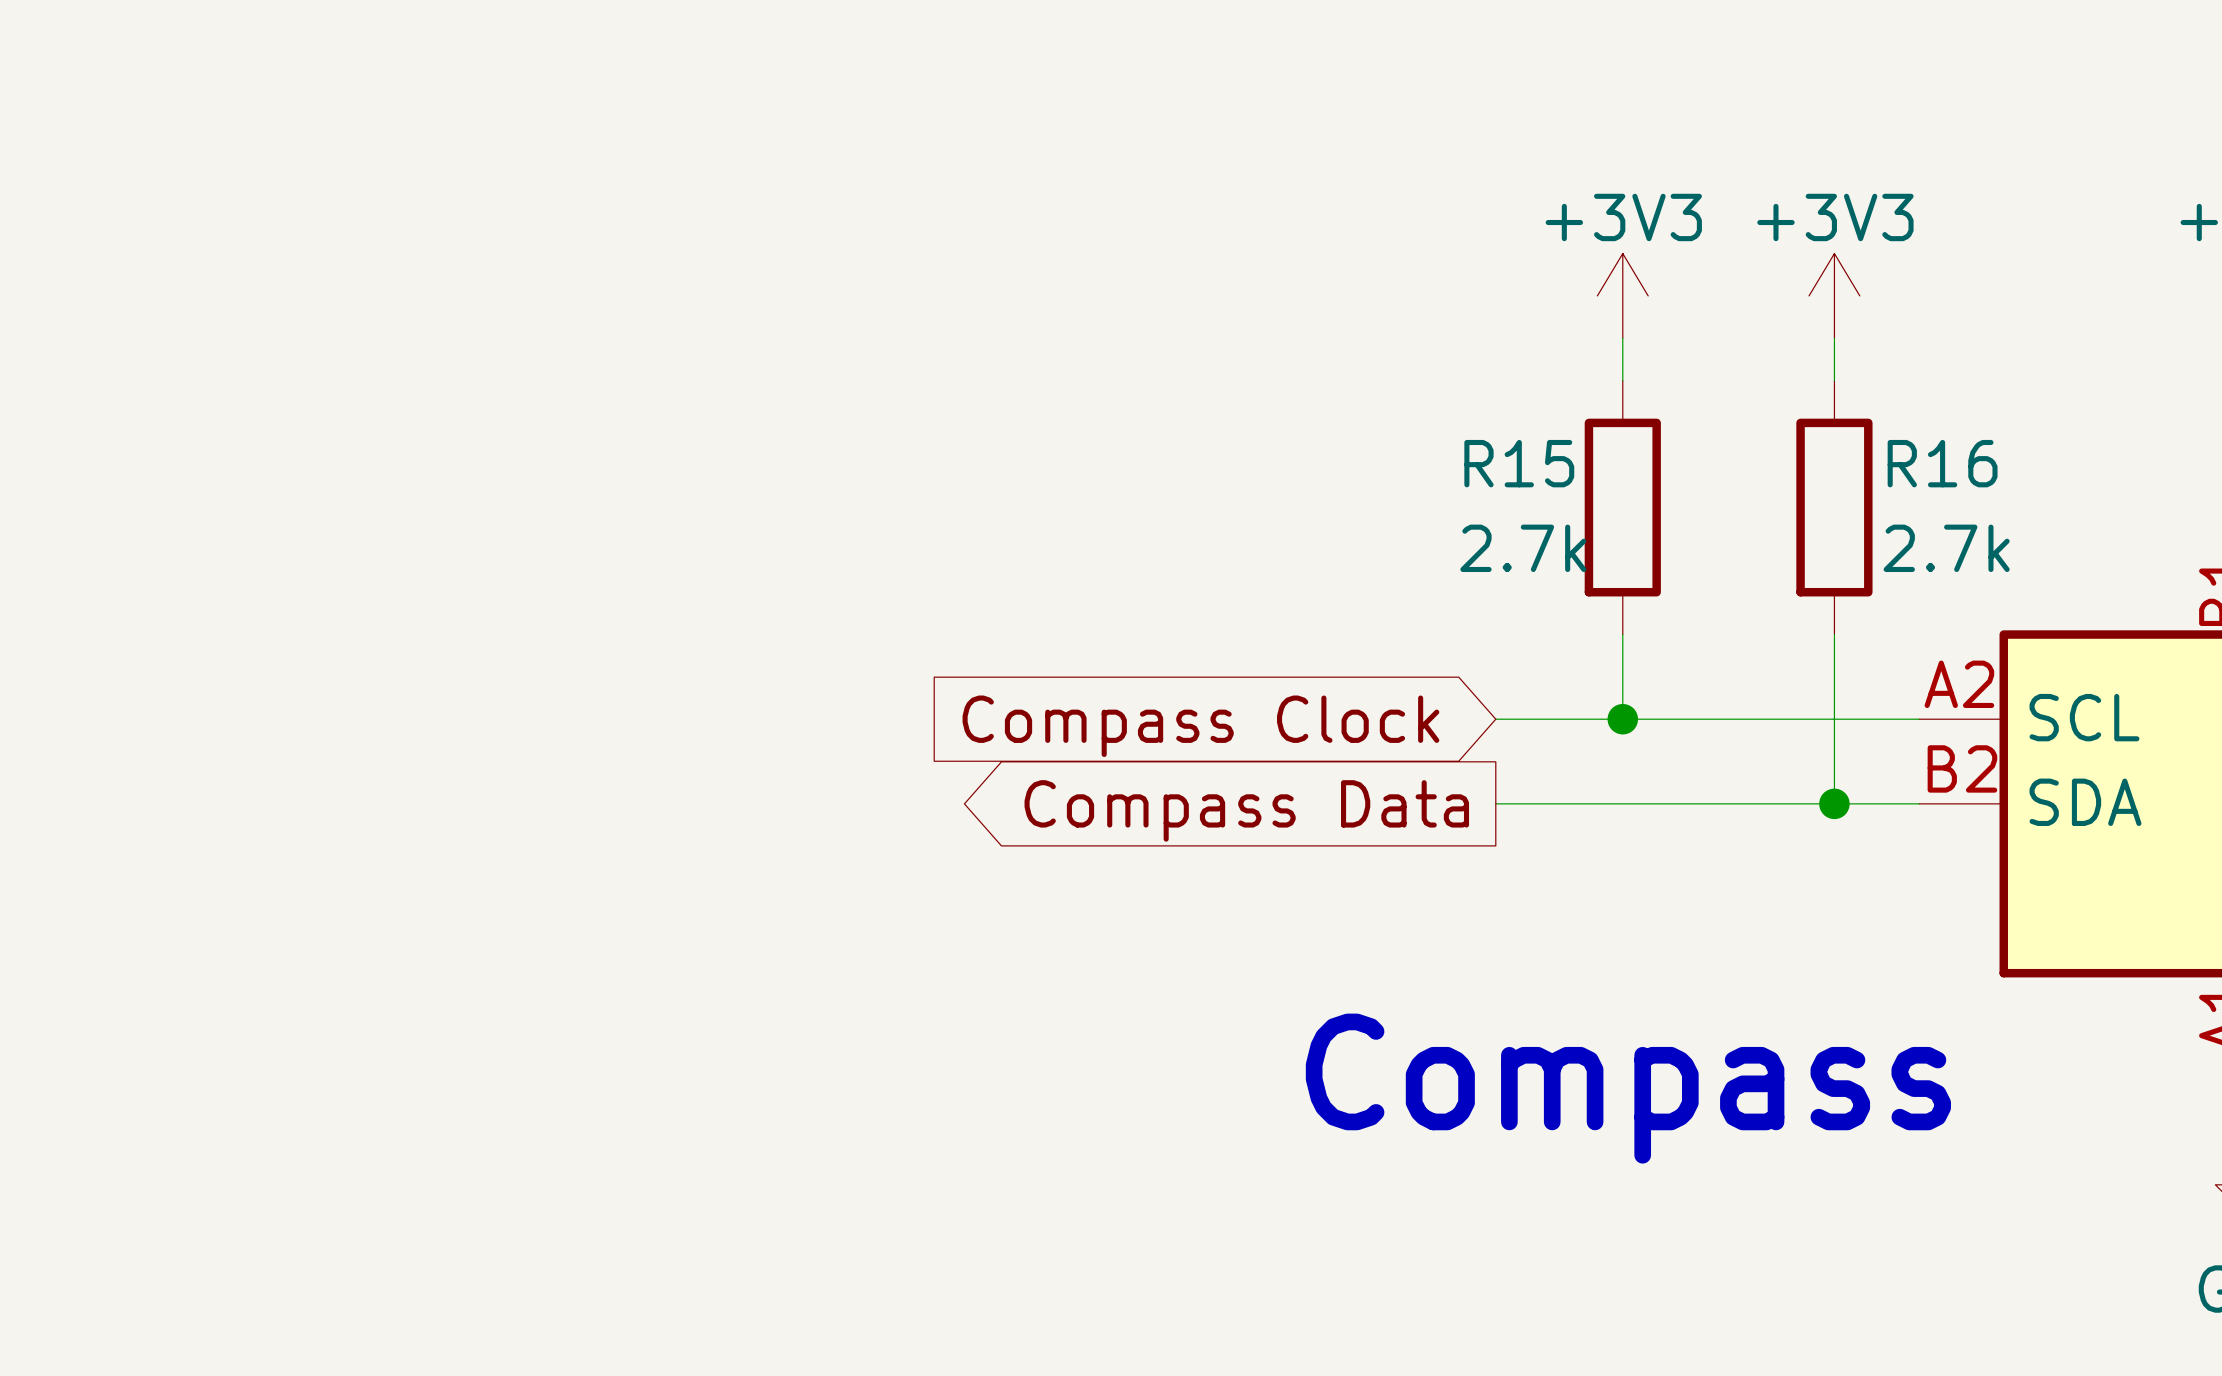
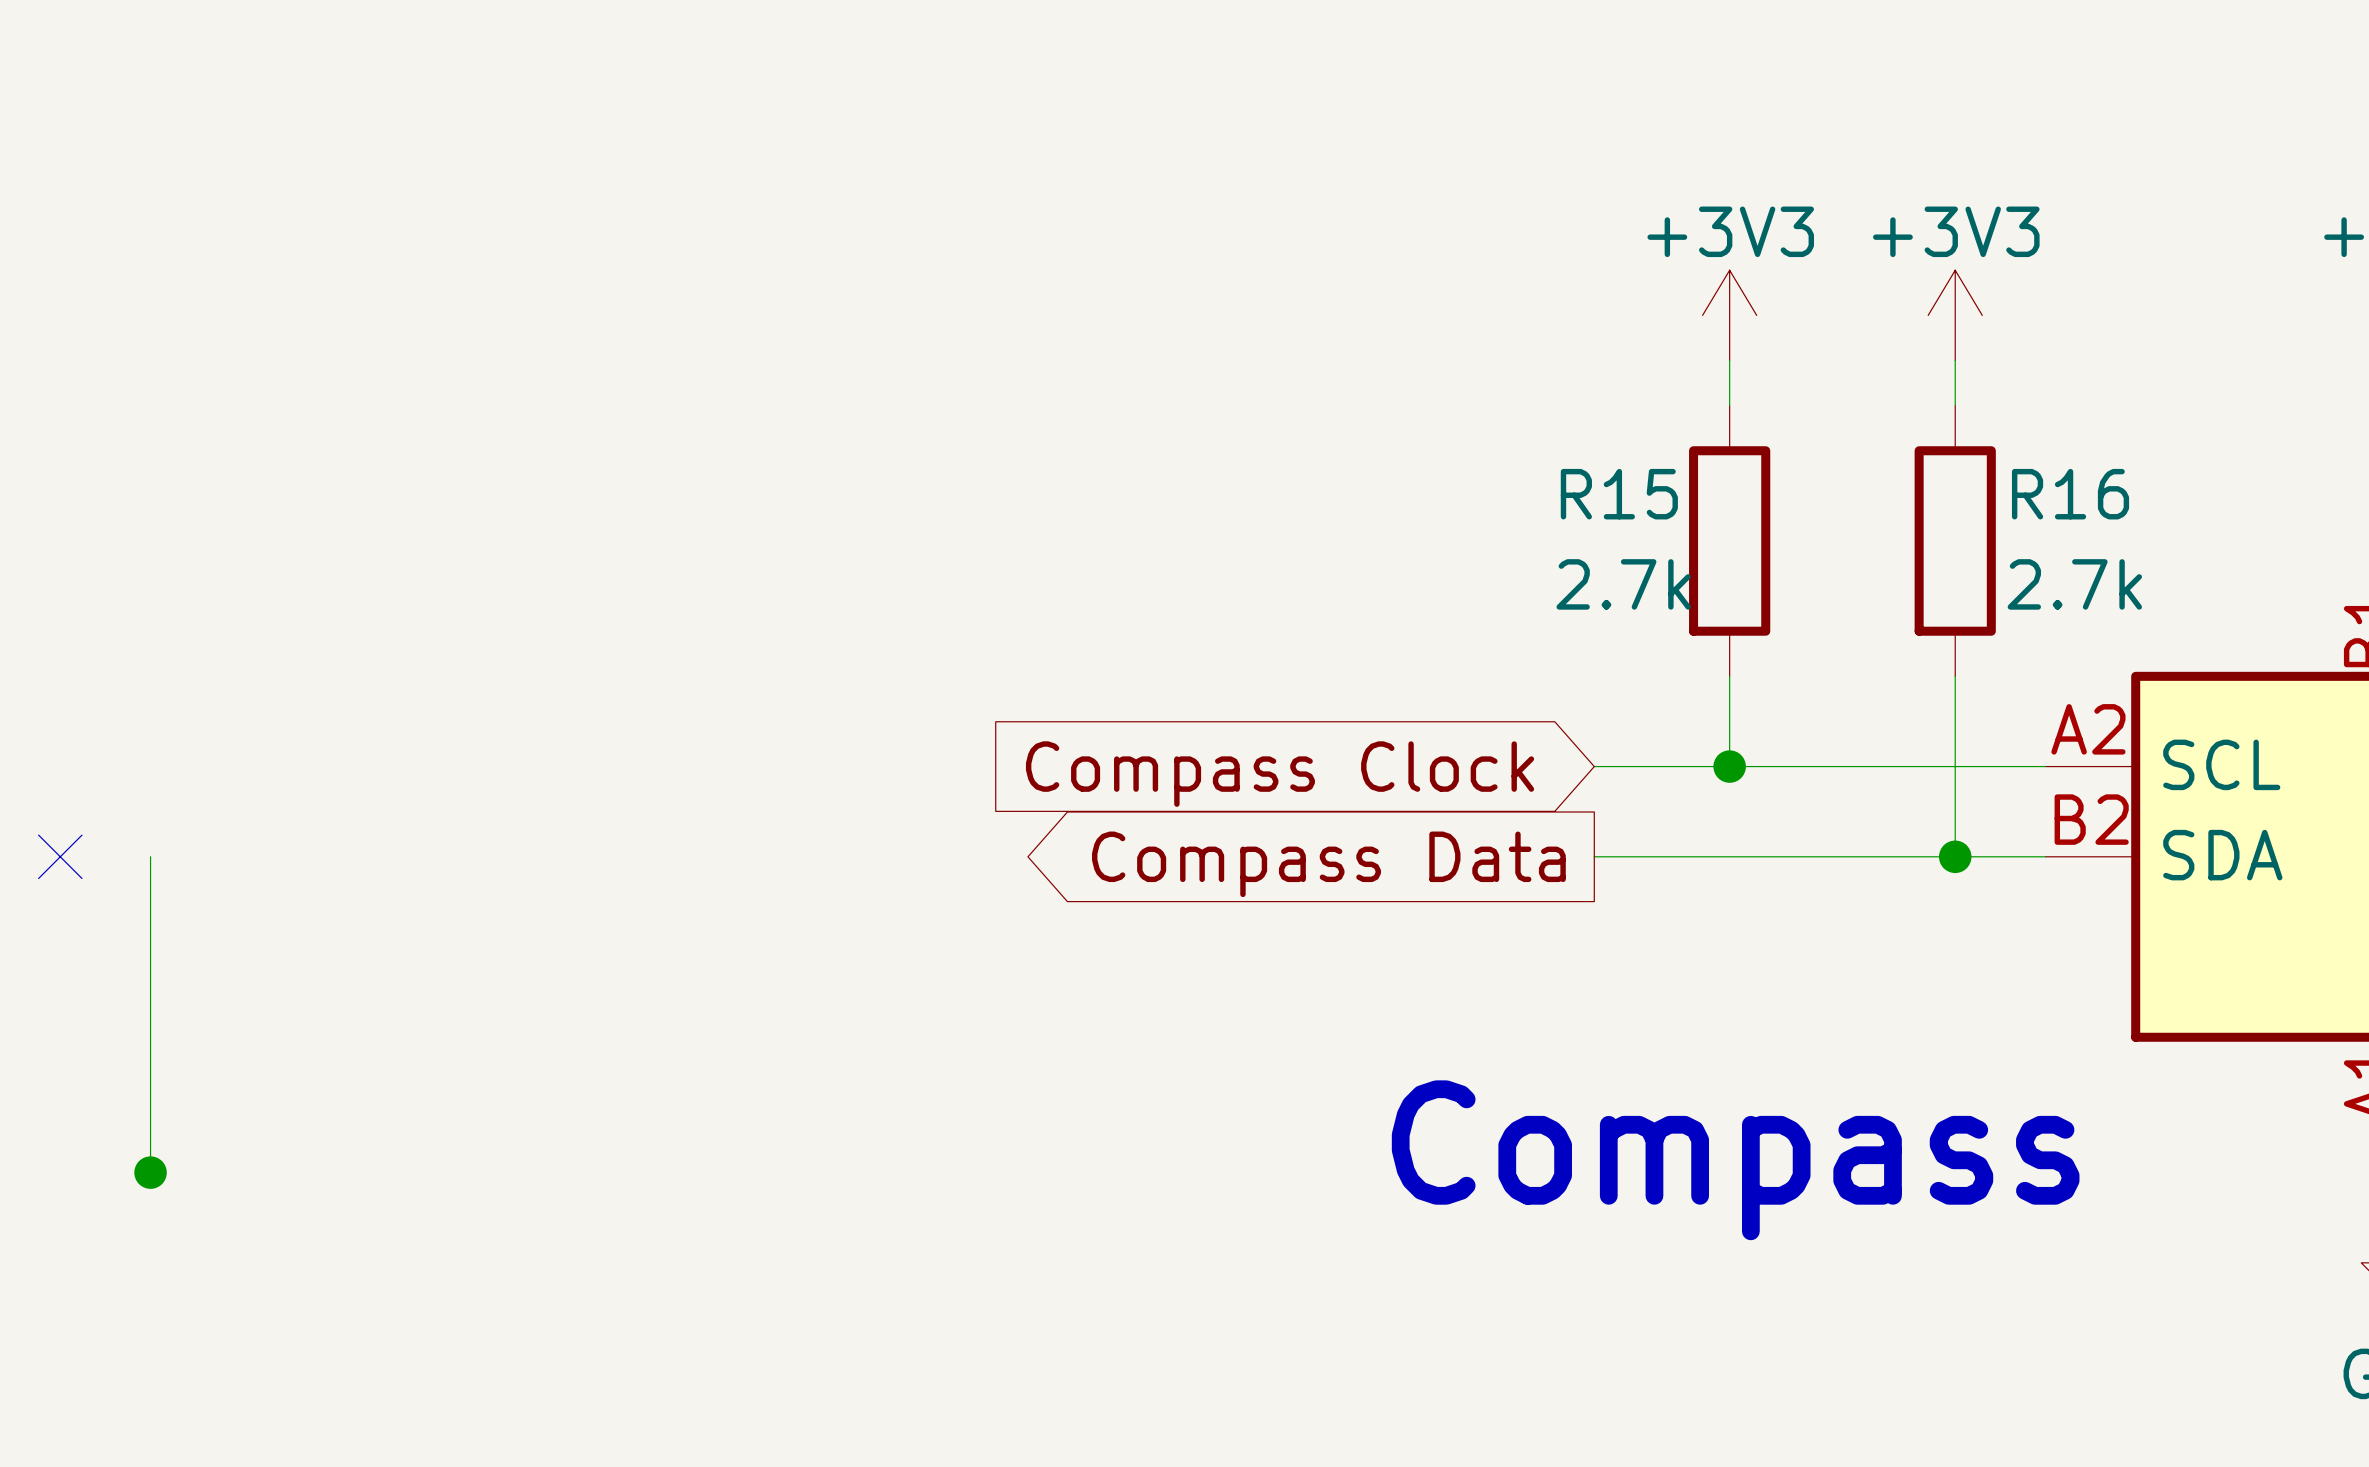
no-connect mark: none -> (60, 856)
wire: none -> (150, 856) (150, 1172)
junction: none -> (150, 1172)

